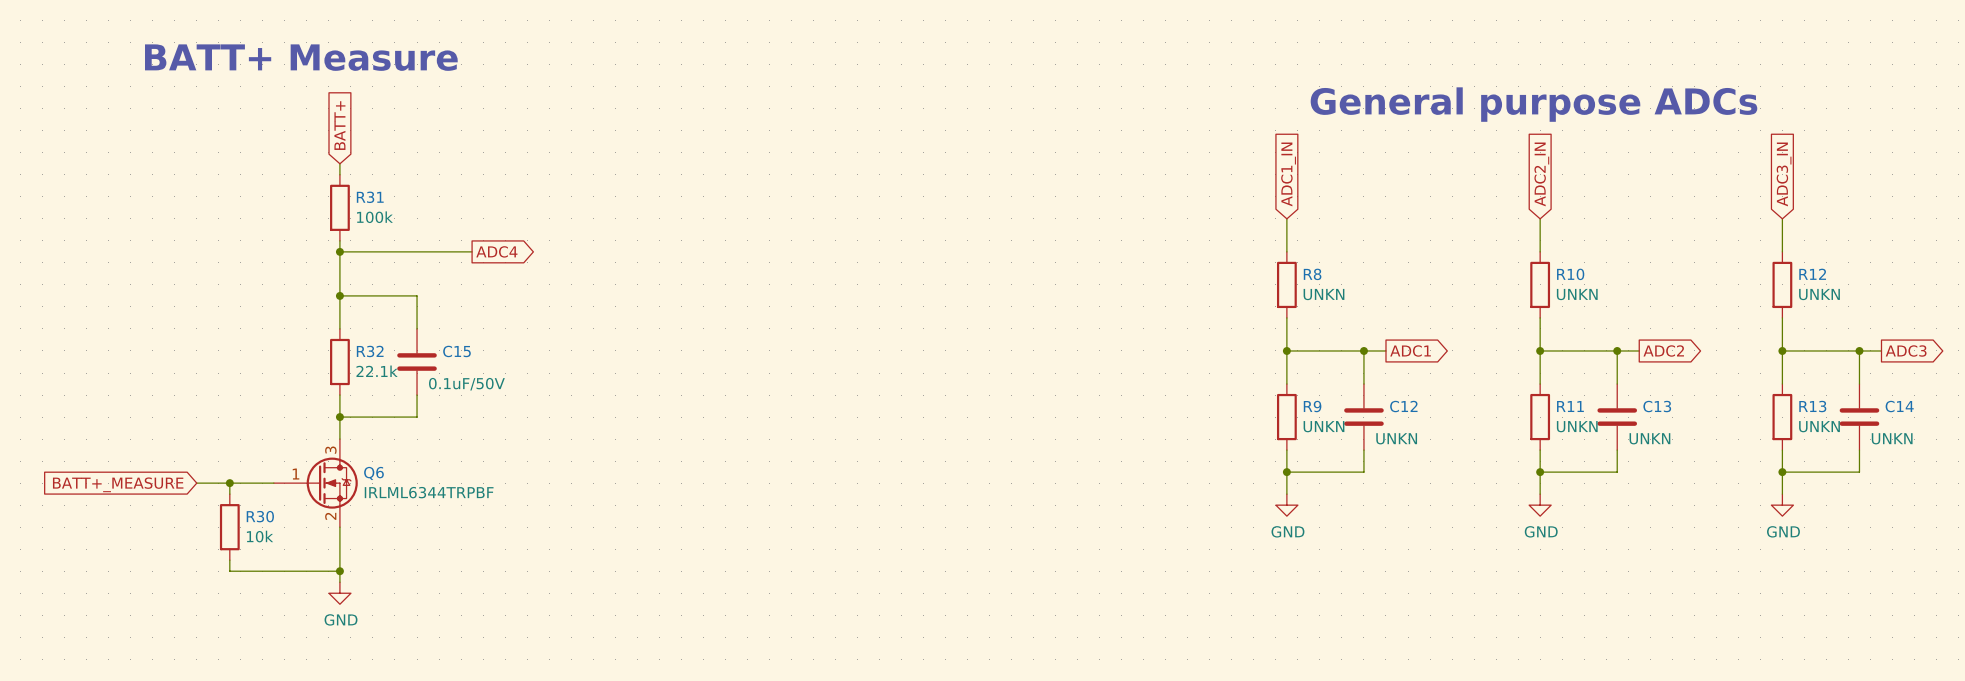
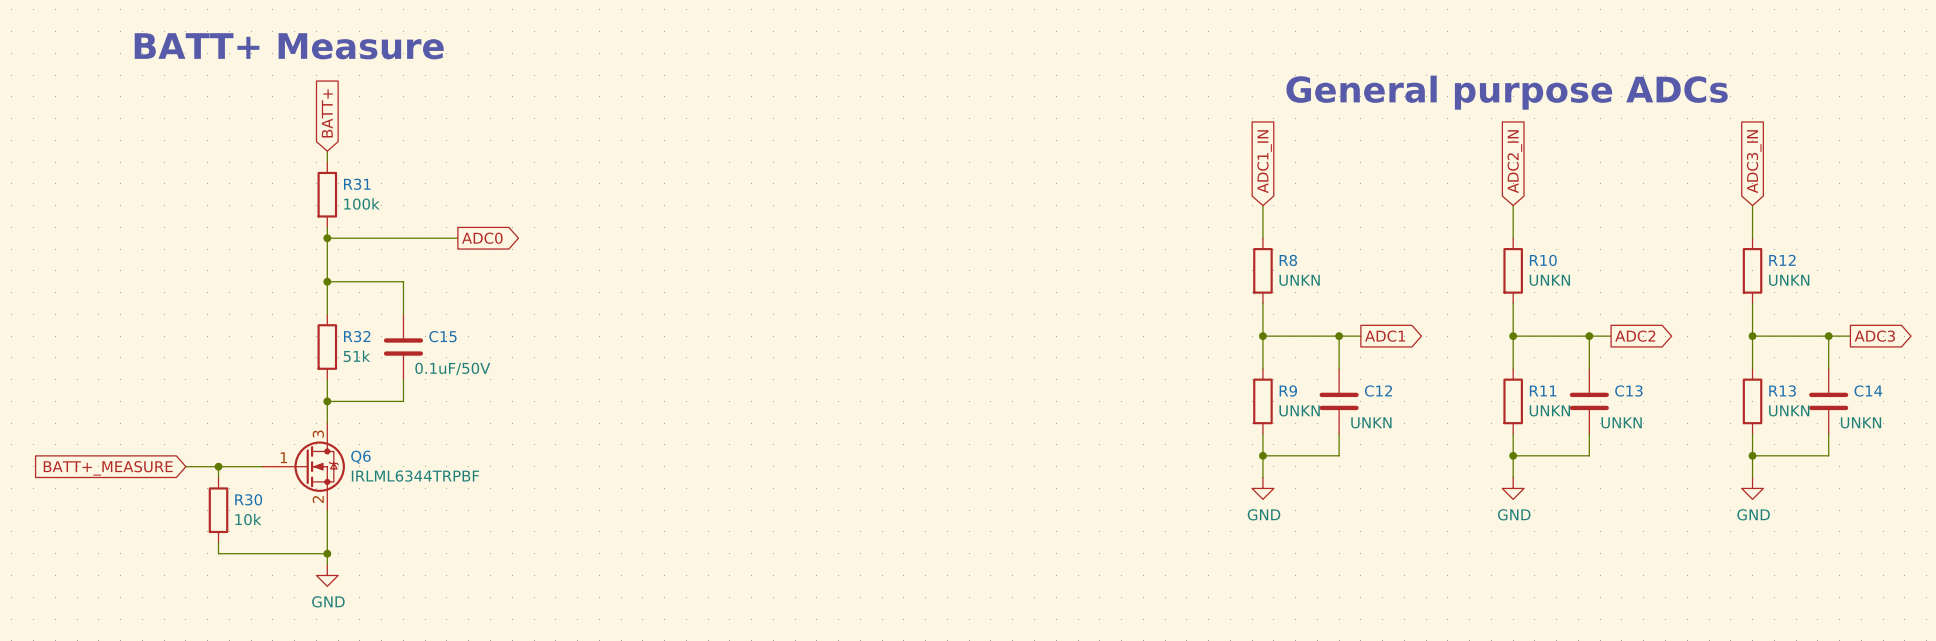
global label: ADC4 (496, 251) -> ADC0 (482, 238)
R32 value: 22.1k (377, 371) -> 51k (356, 356)

